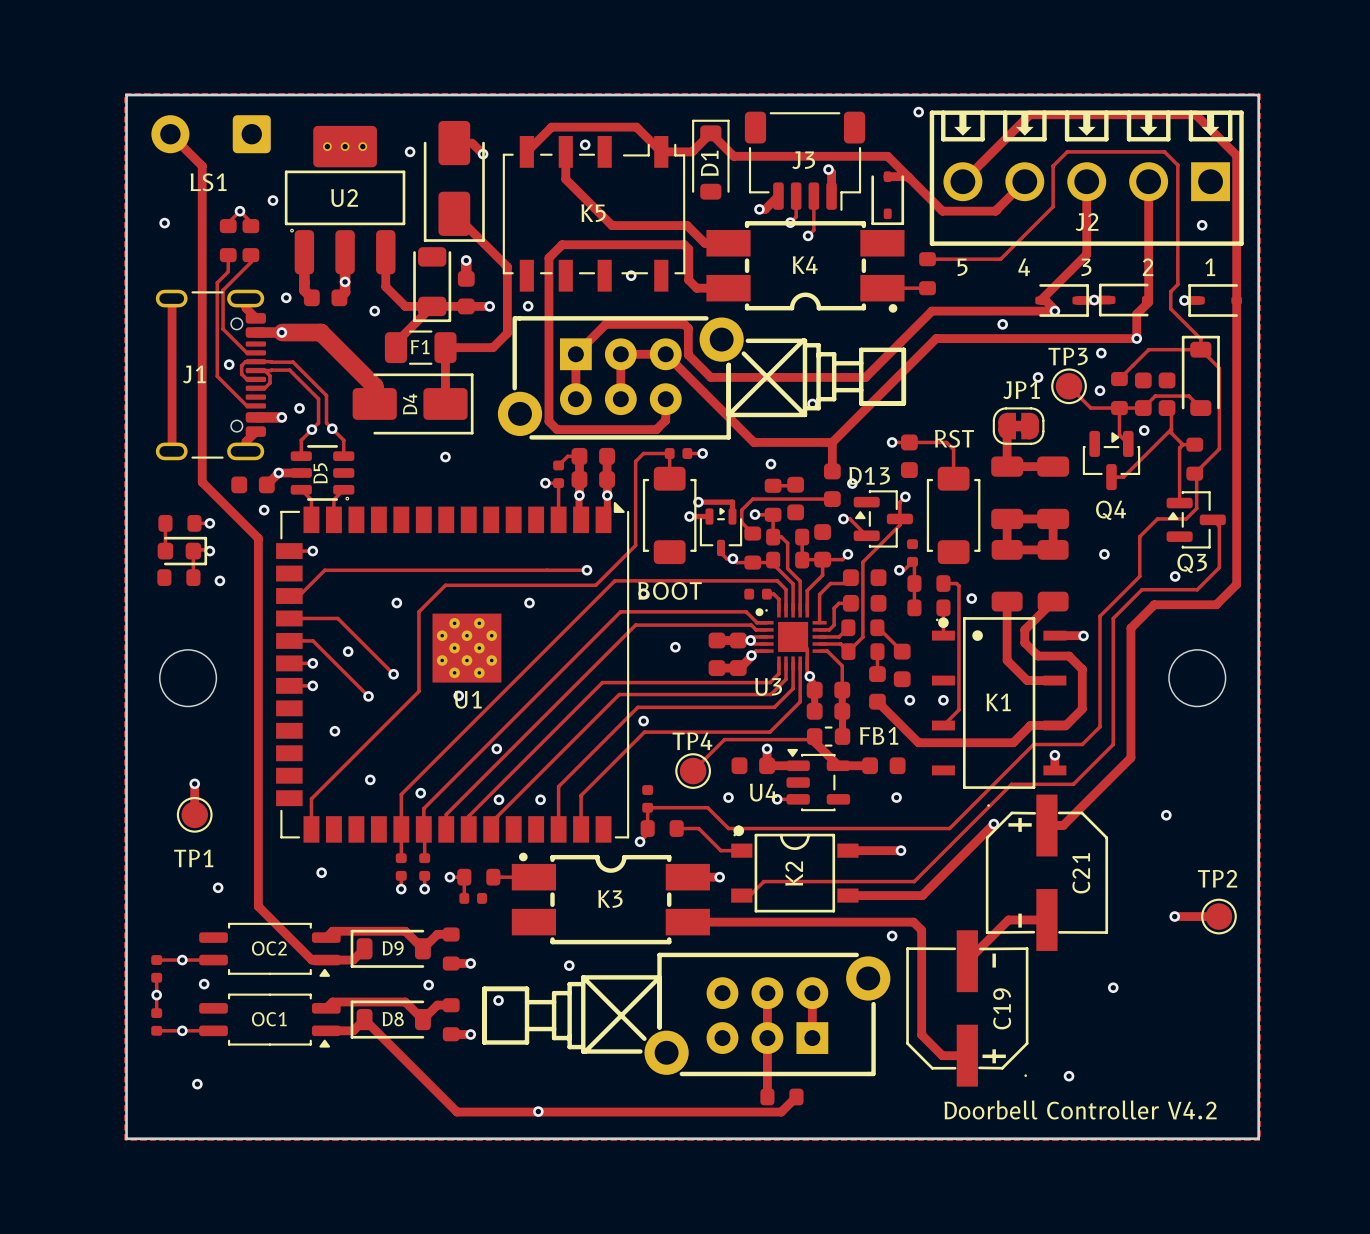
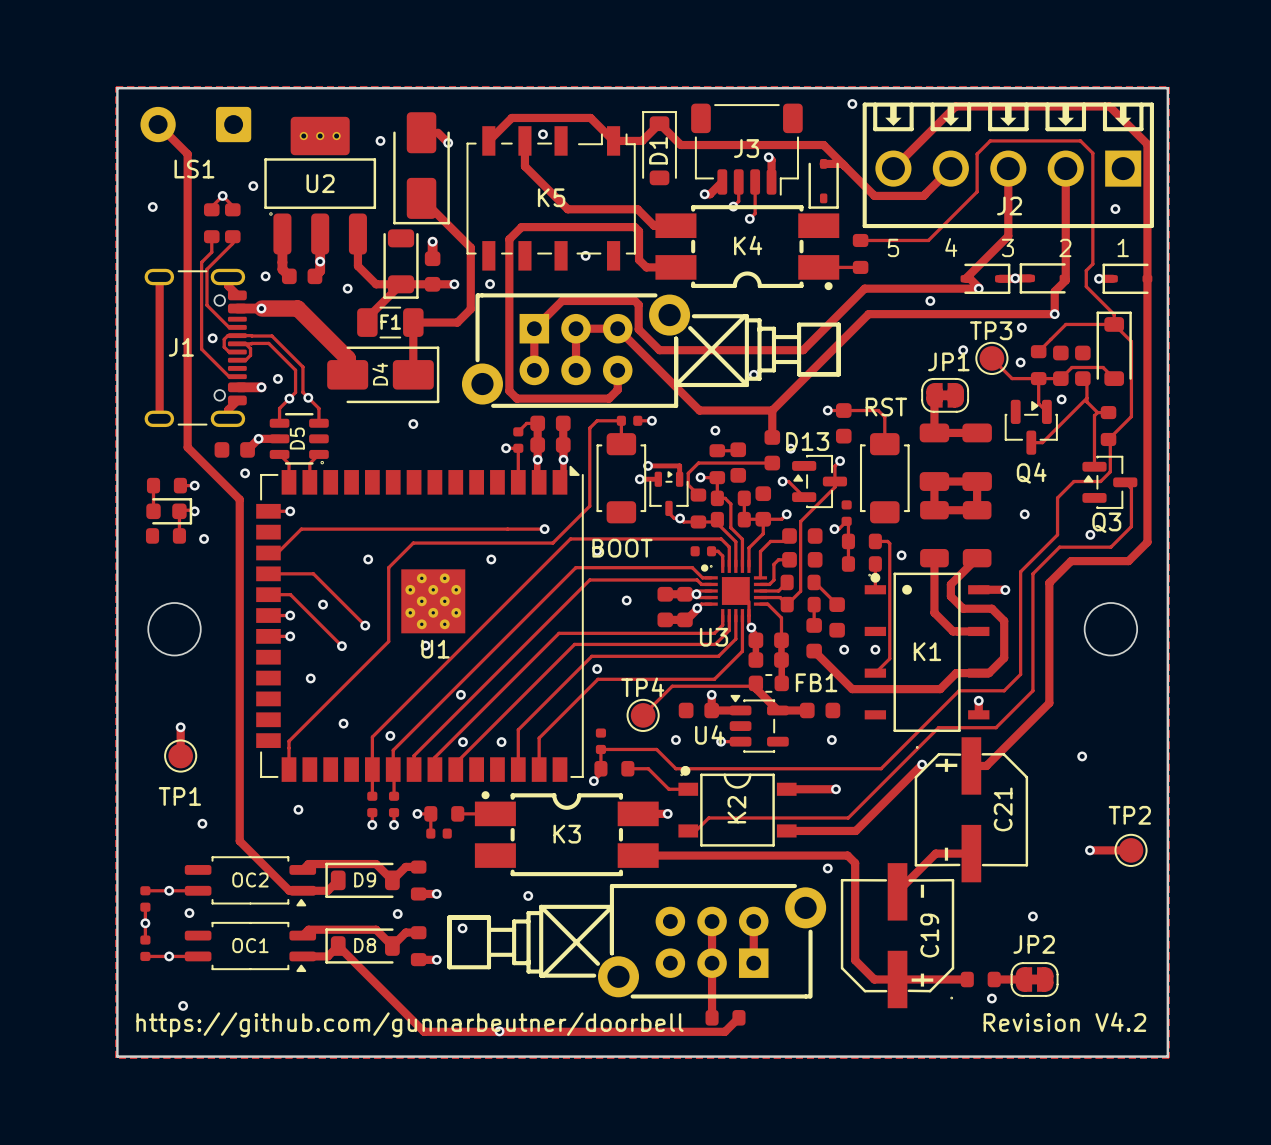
track: none -> (897, 979) (967, 979)
part: none -> (980, 979)
track: none -> (994, 979) (1023, 979)
JP2: none -> (1034, 979)
text: none -> Revision V4.2 (1064, 1022)
text: none -> https://github.com/gunnarbeutner/doorbell (410, 1024)
text: Doorbell Controller V4.2 (1080, 1110) -> none

